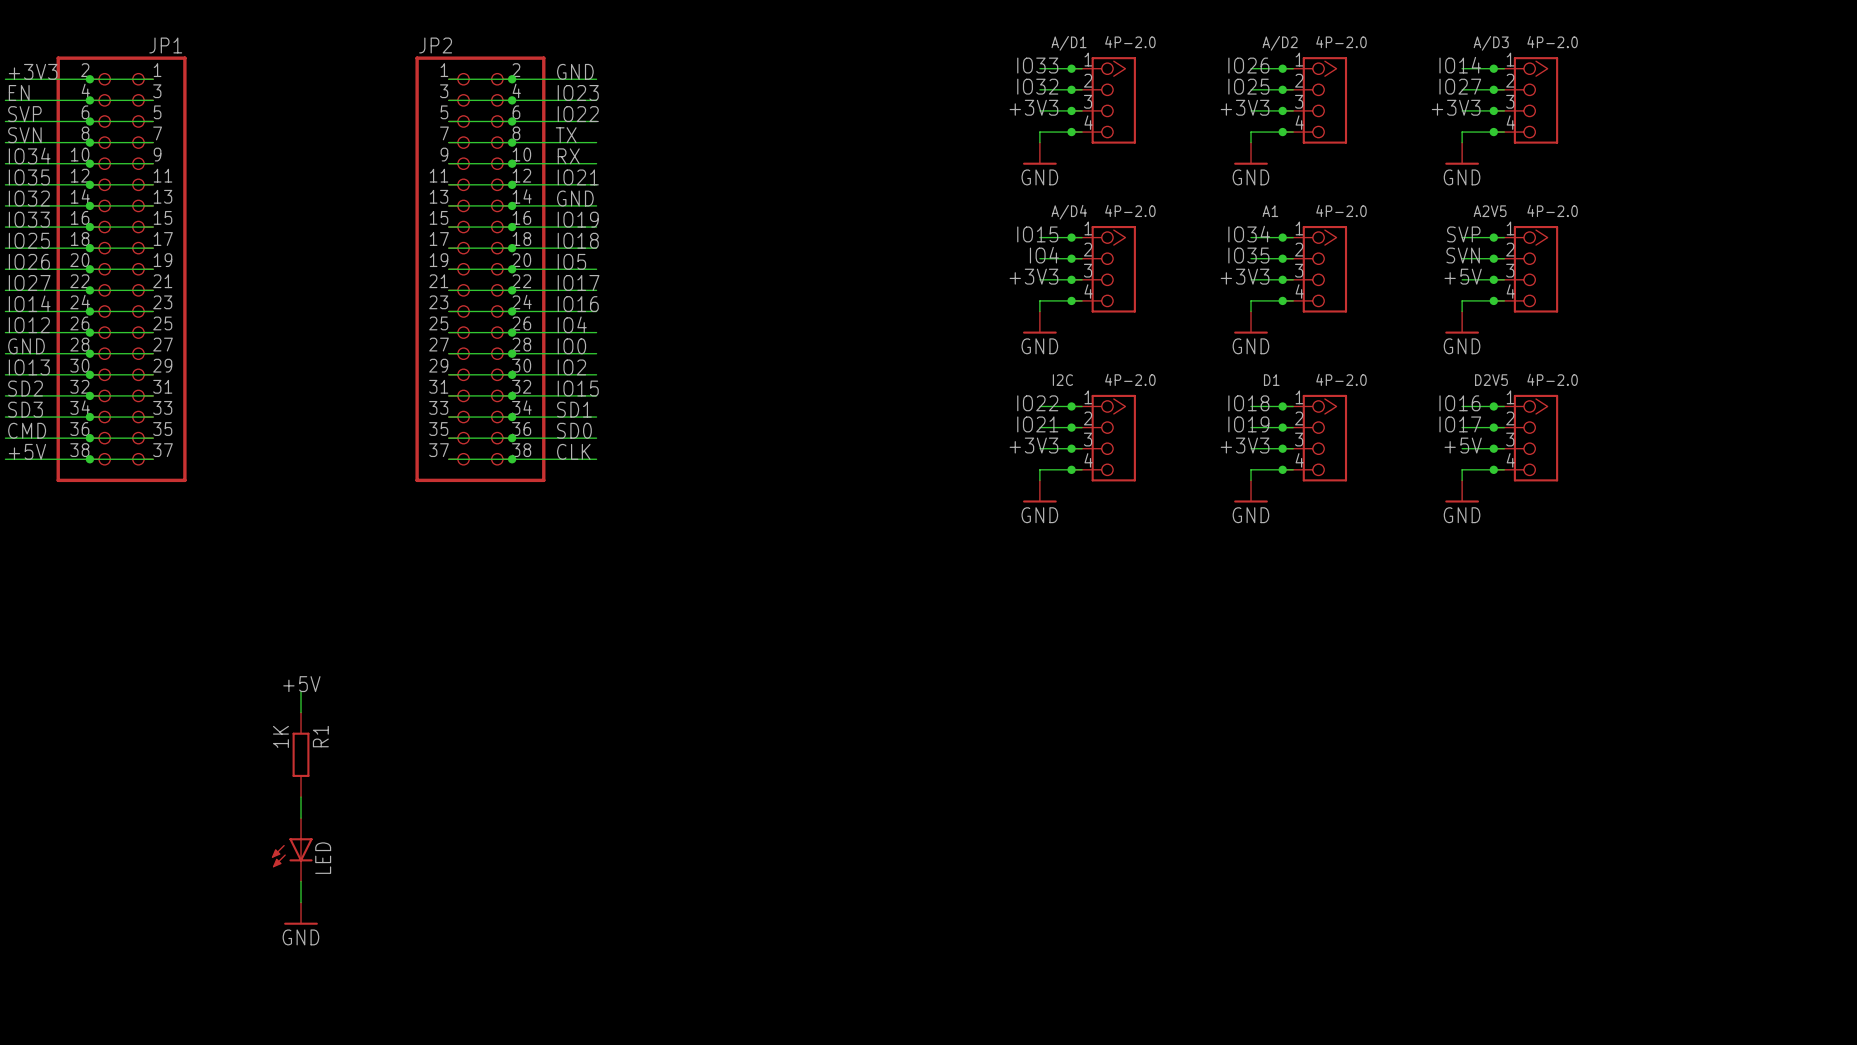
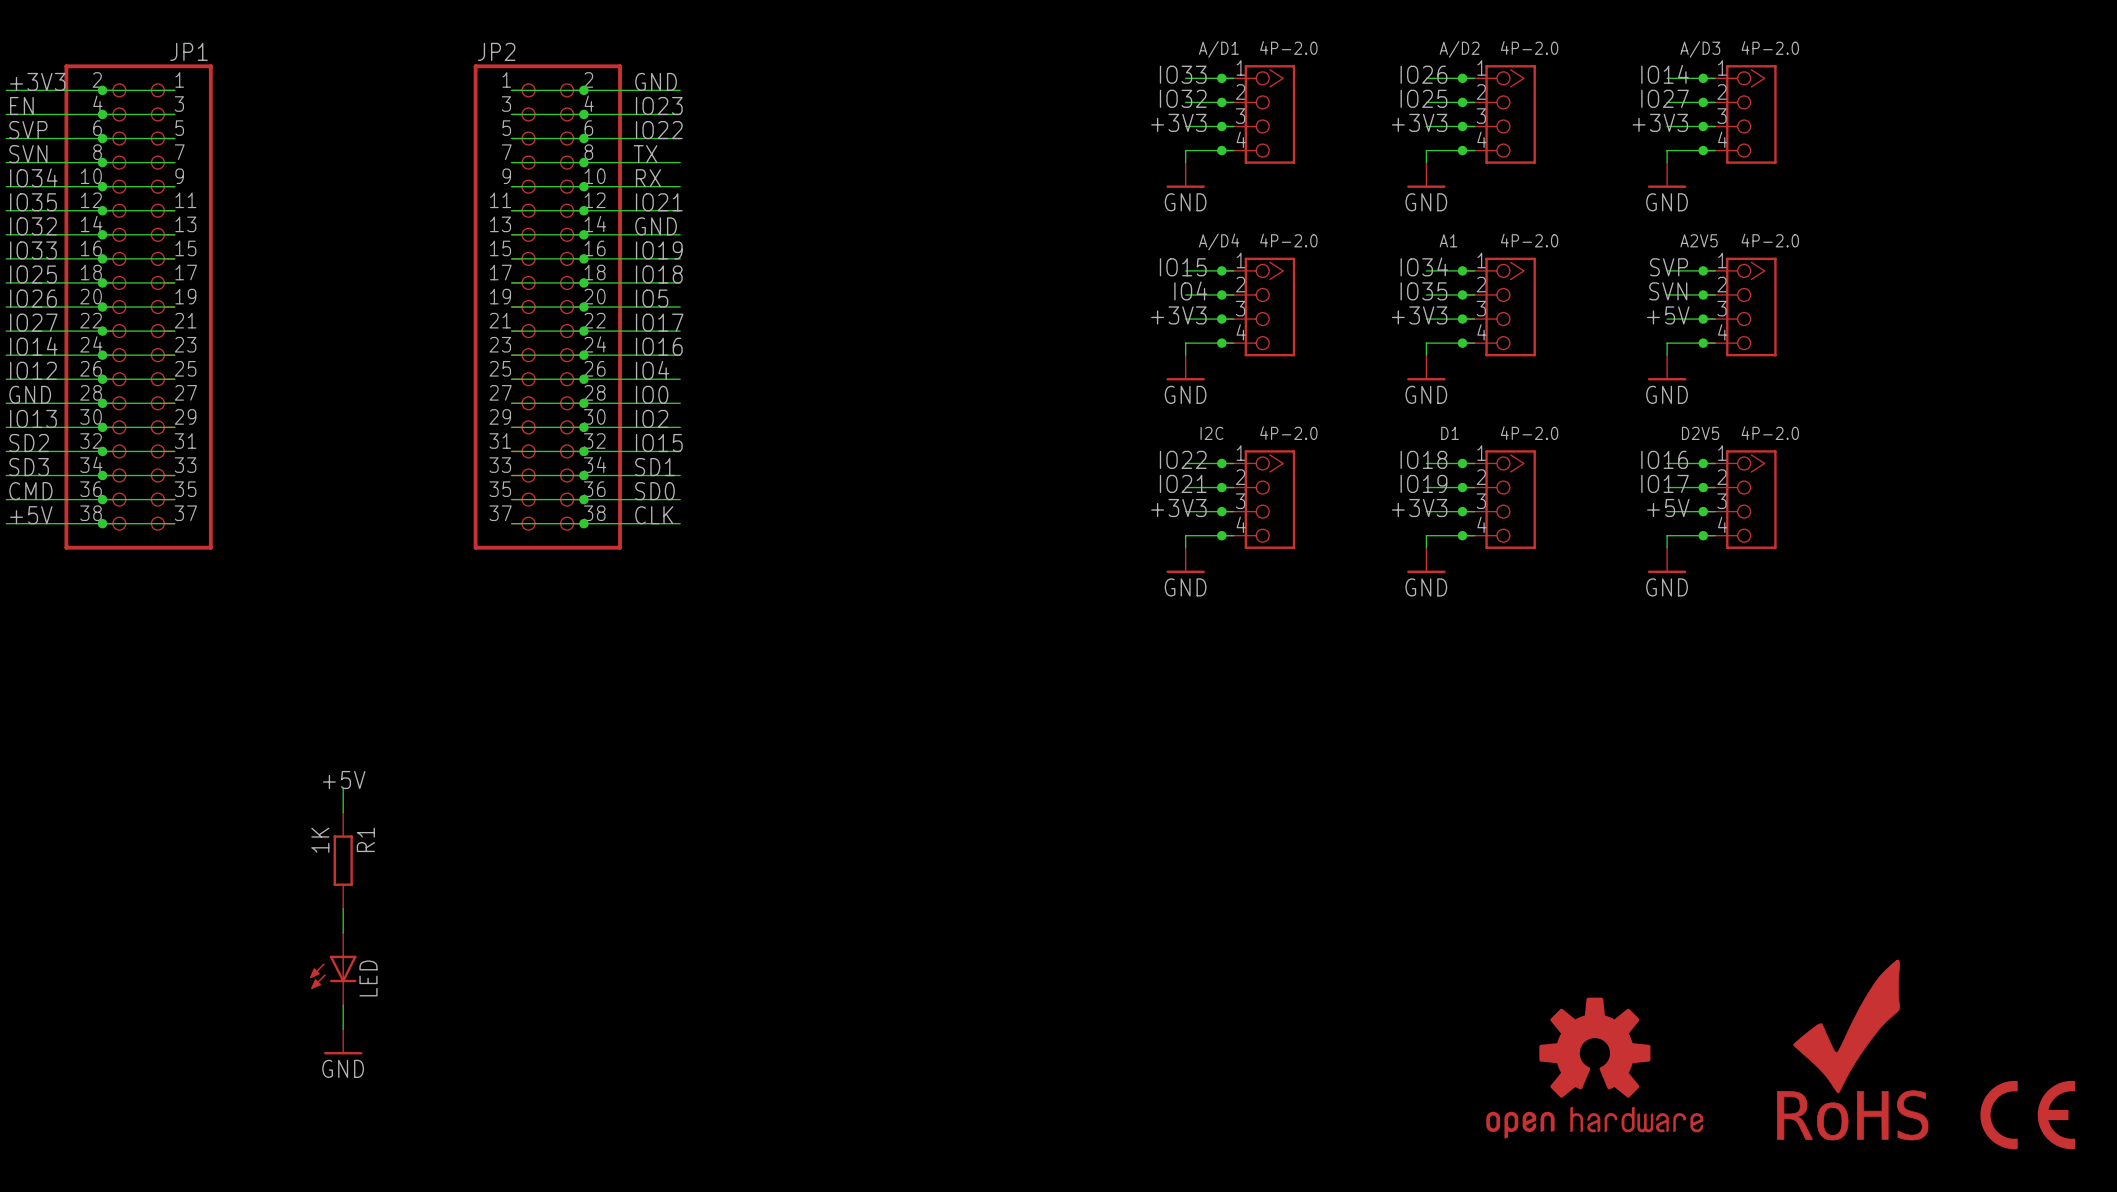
part: none -> (1852, 1050)
part: none -> (1594, 1068)
part: none -> (2027, 1115)

